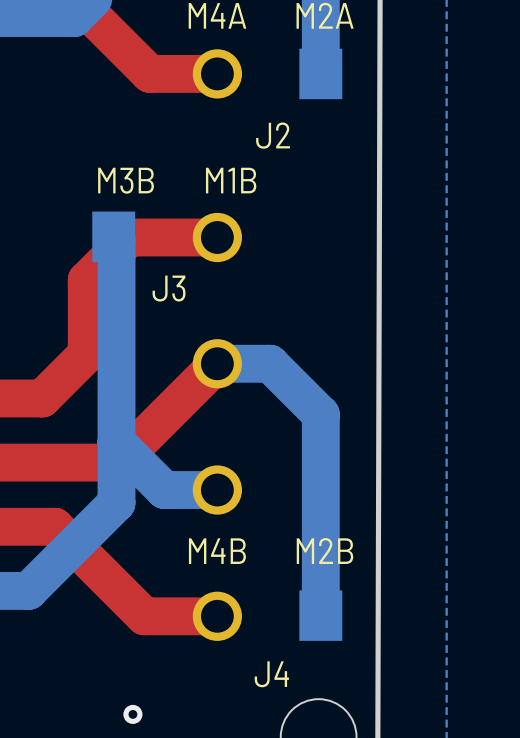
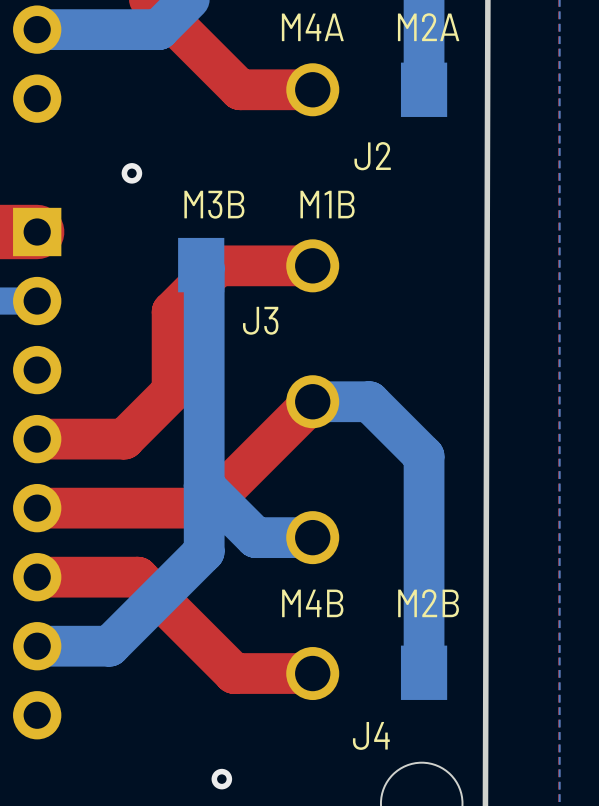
via: none -> (131, 173)

